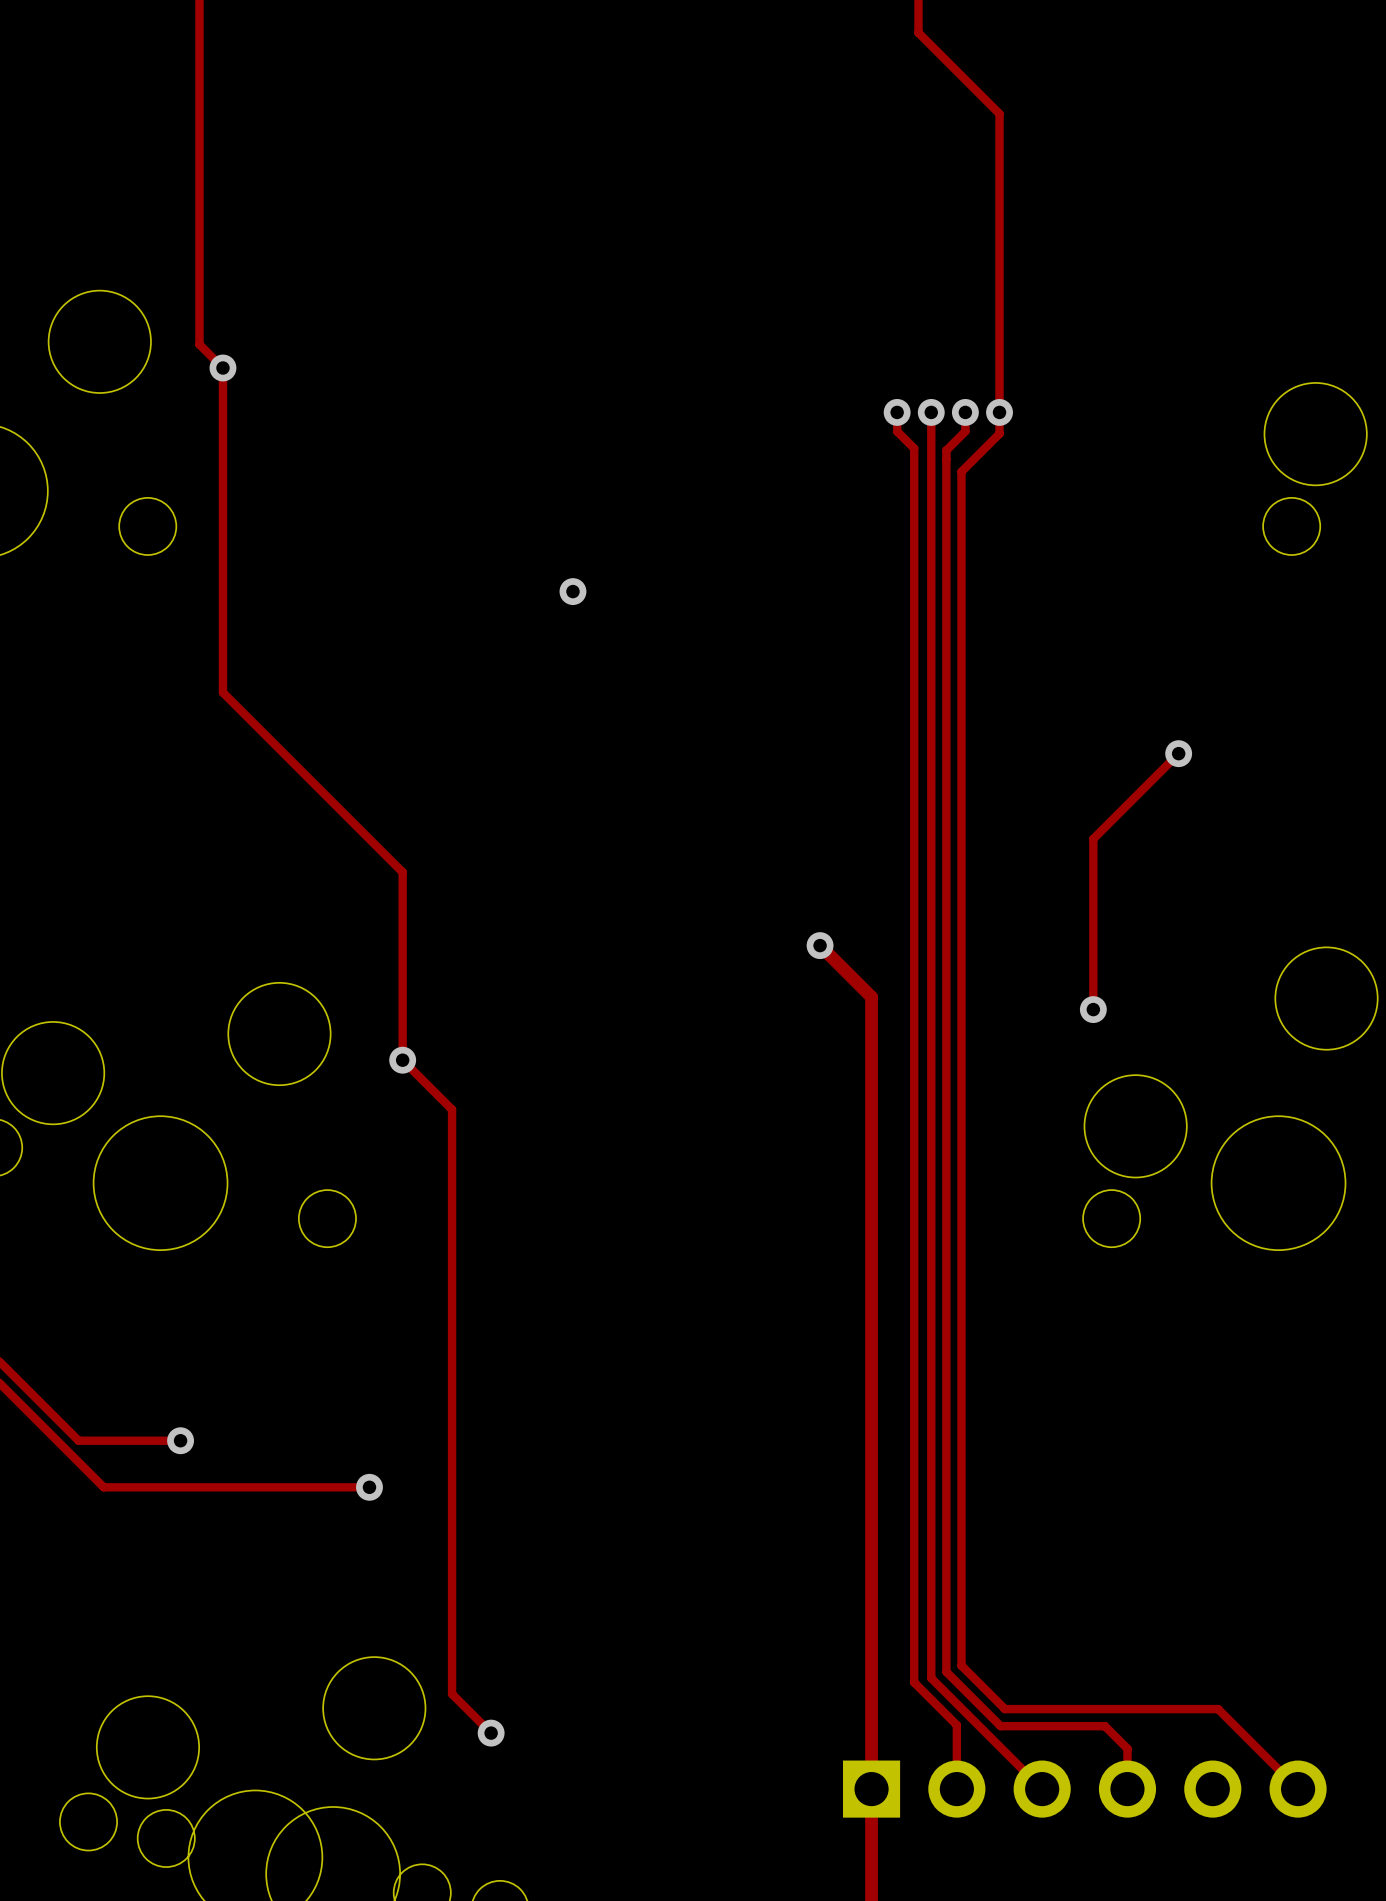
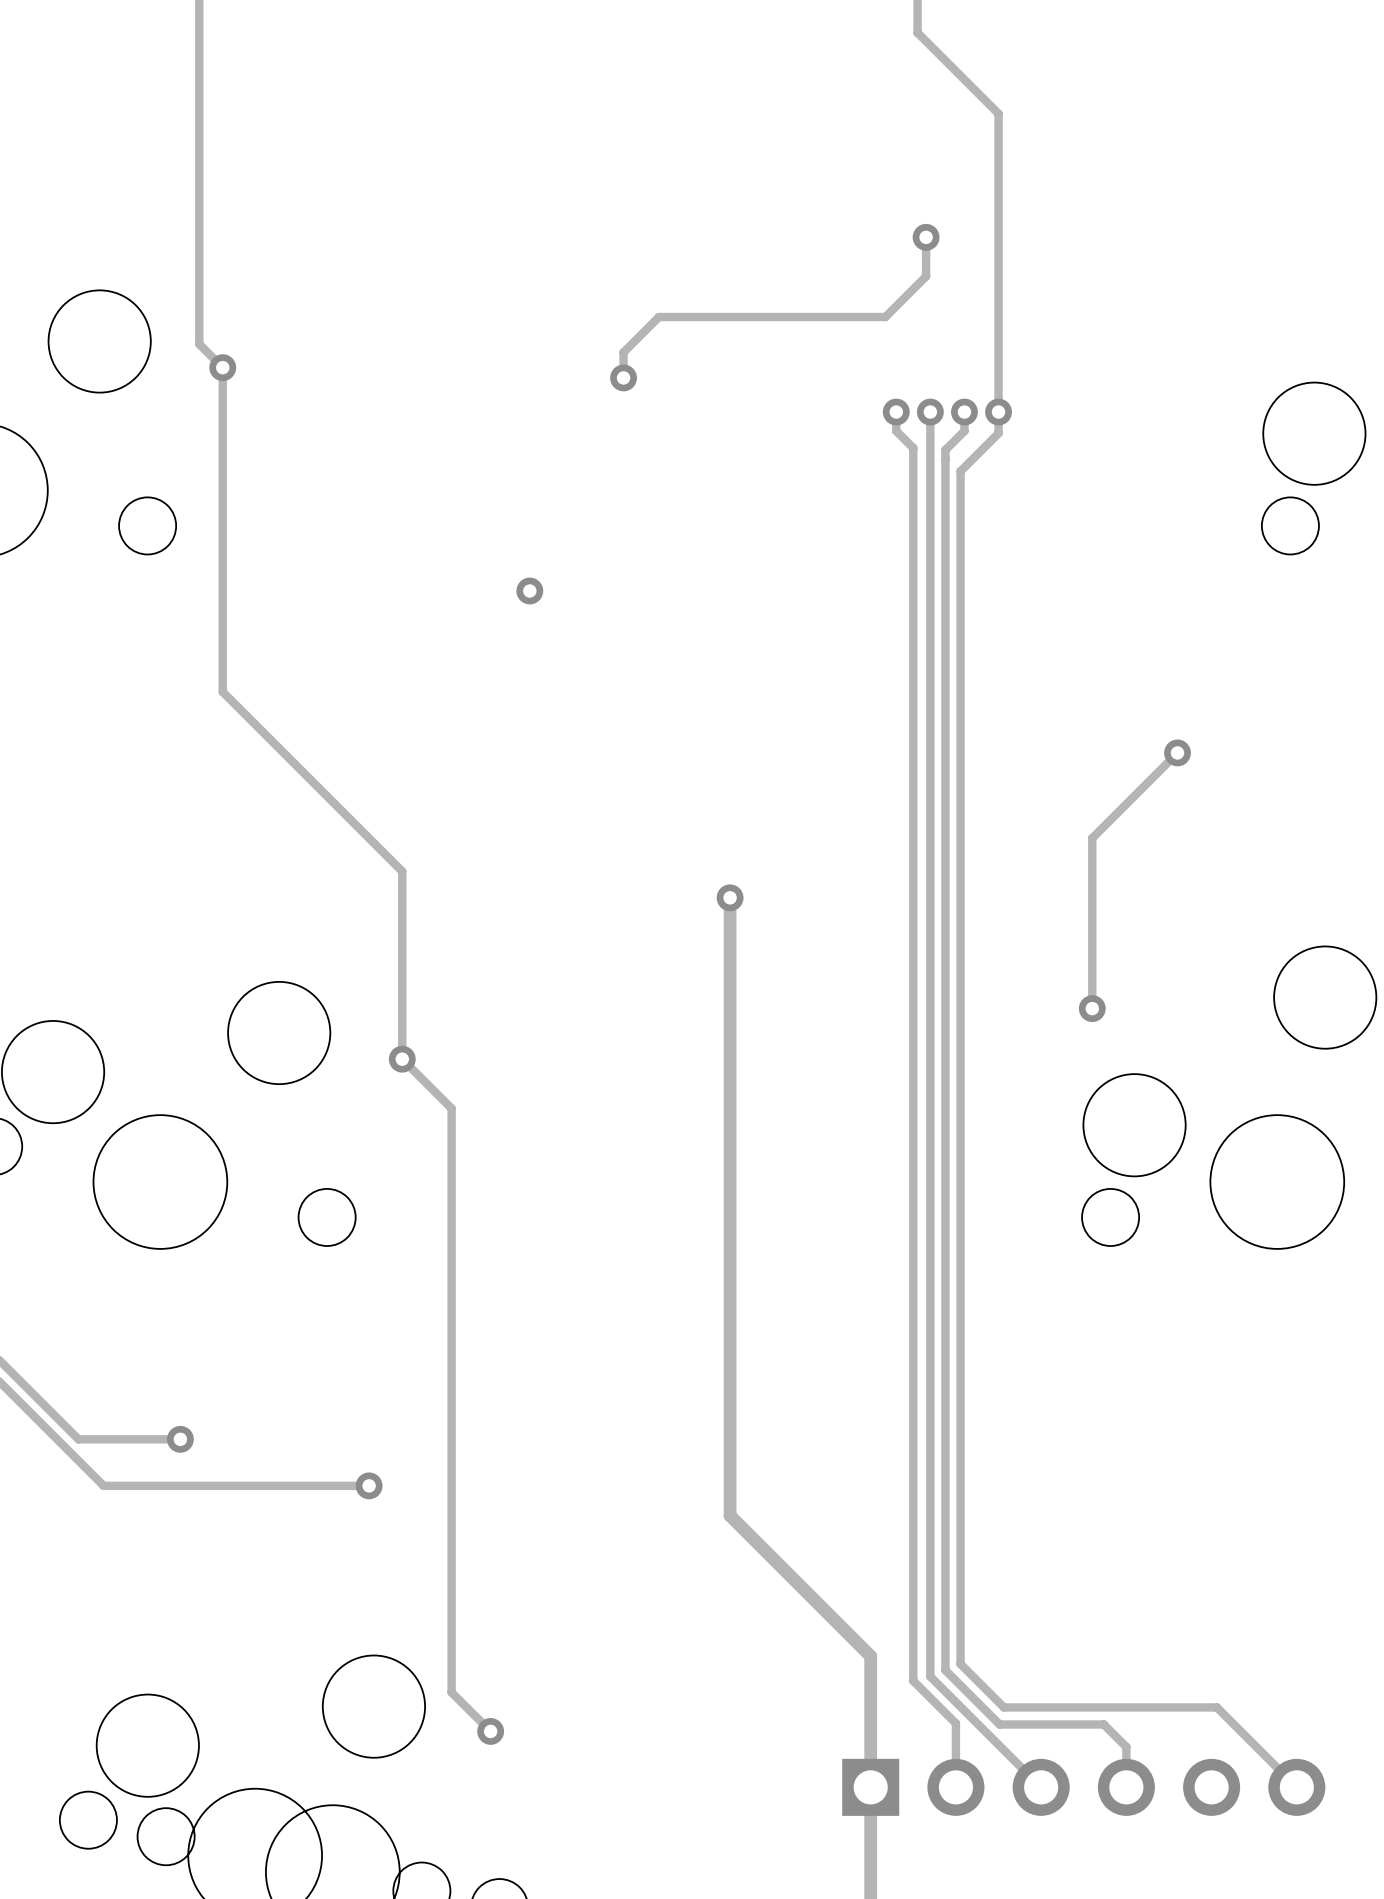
track: none -> (926, 237) (926, 276) (885, 317) (658, 317) (623, 352) (623, 377)
via: none -> (926, 237)
via: none -> (623, 377)
via position: (572, 591) -> (529, 591)
track: (820, 945) (871, 997) (871, 1657) -> (730, 910) (730, 1515) (870, 1656)
via position: (820, 945) -> (730, 897)

